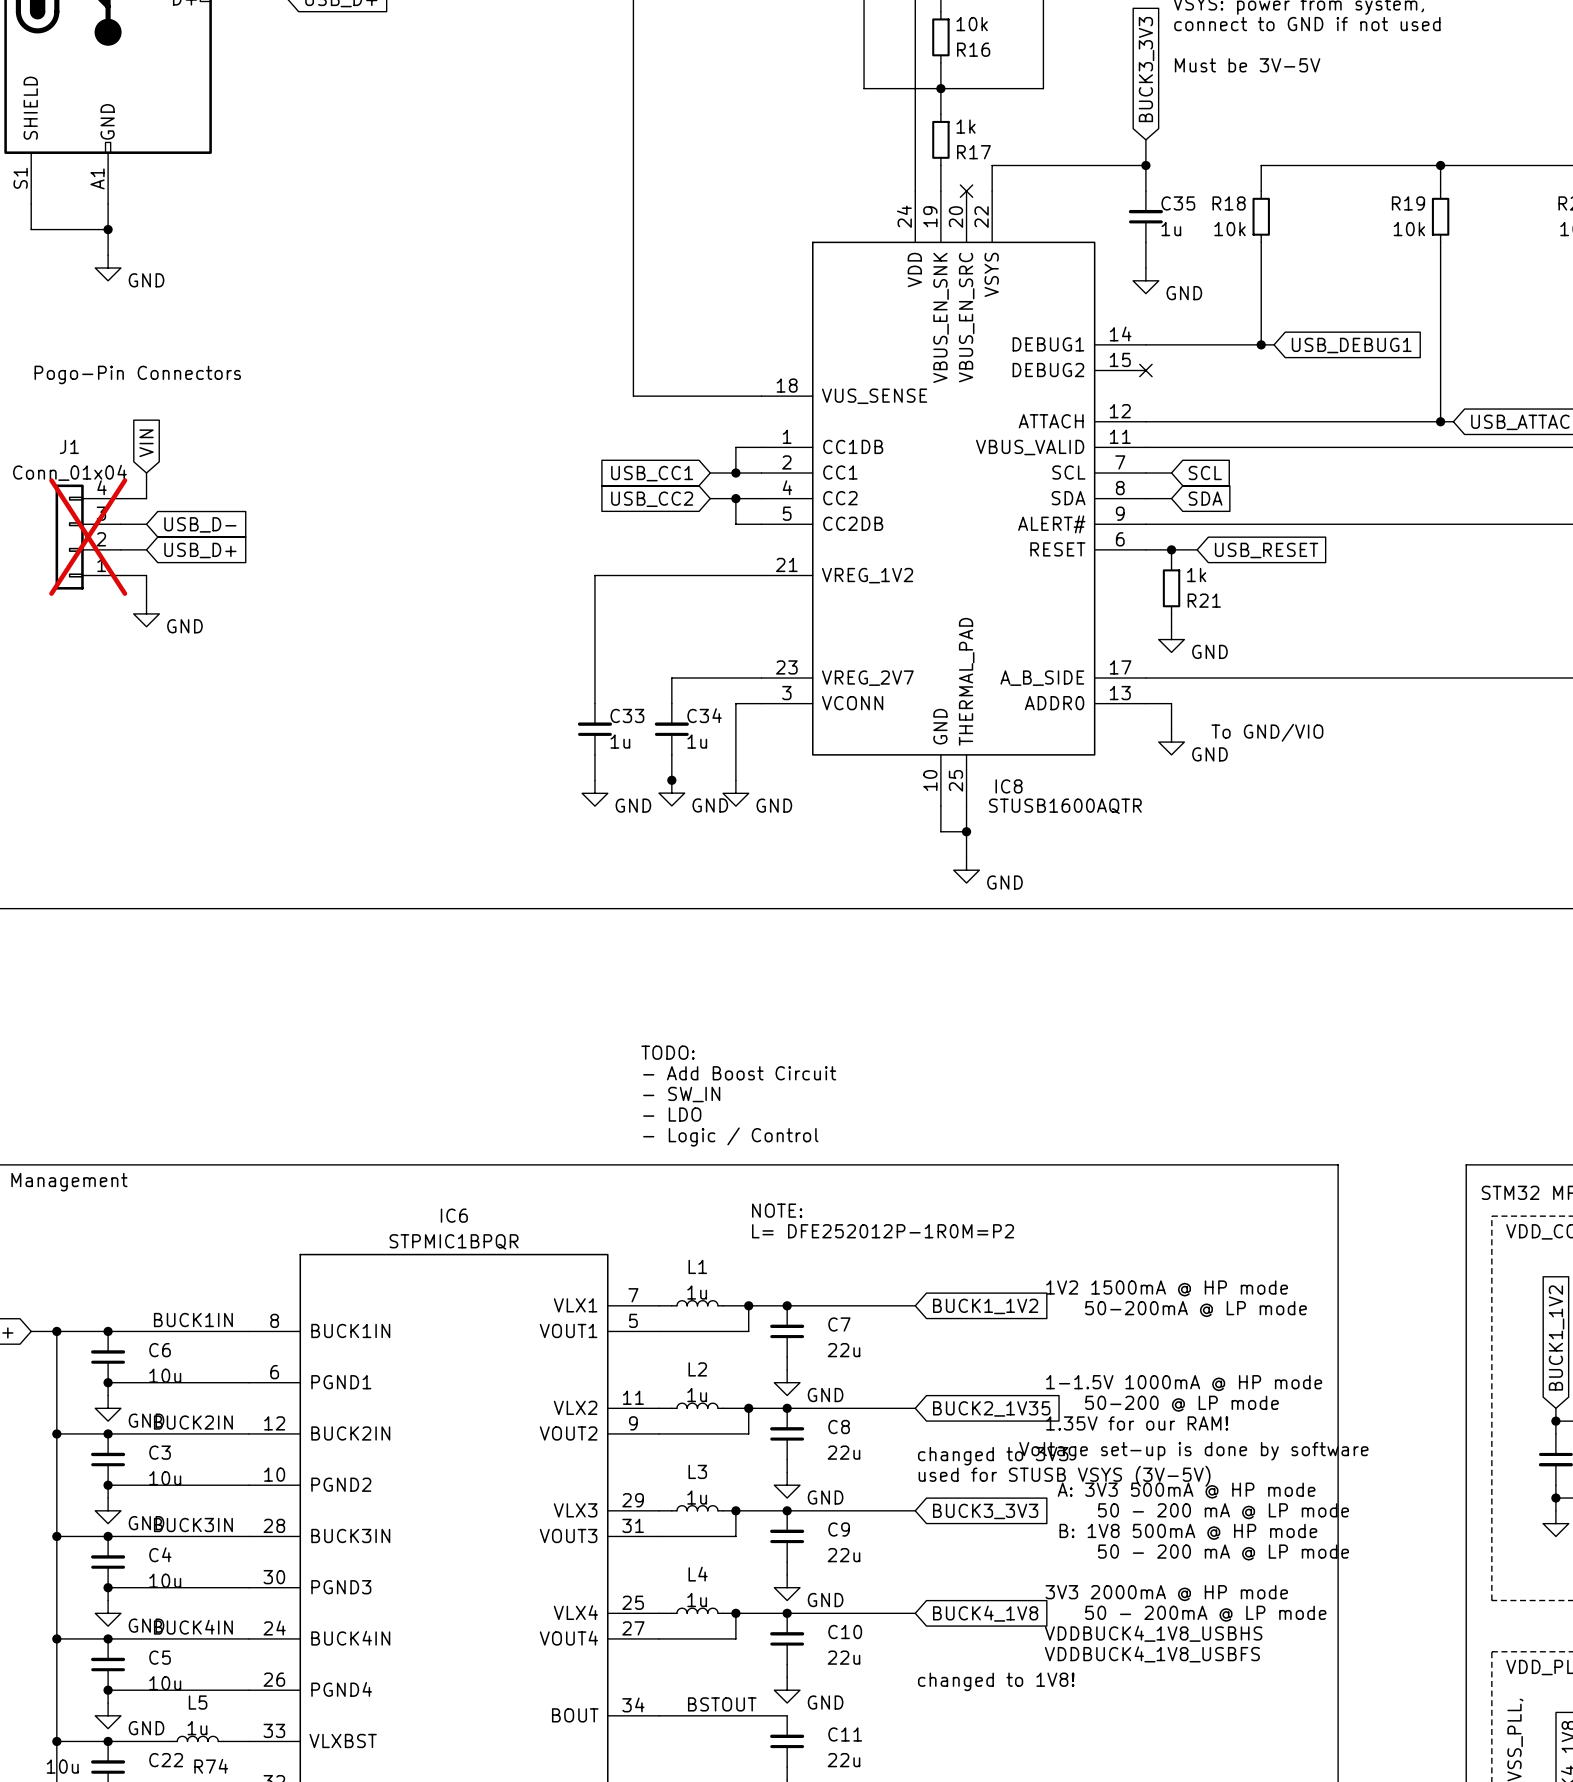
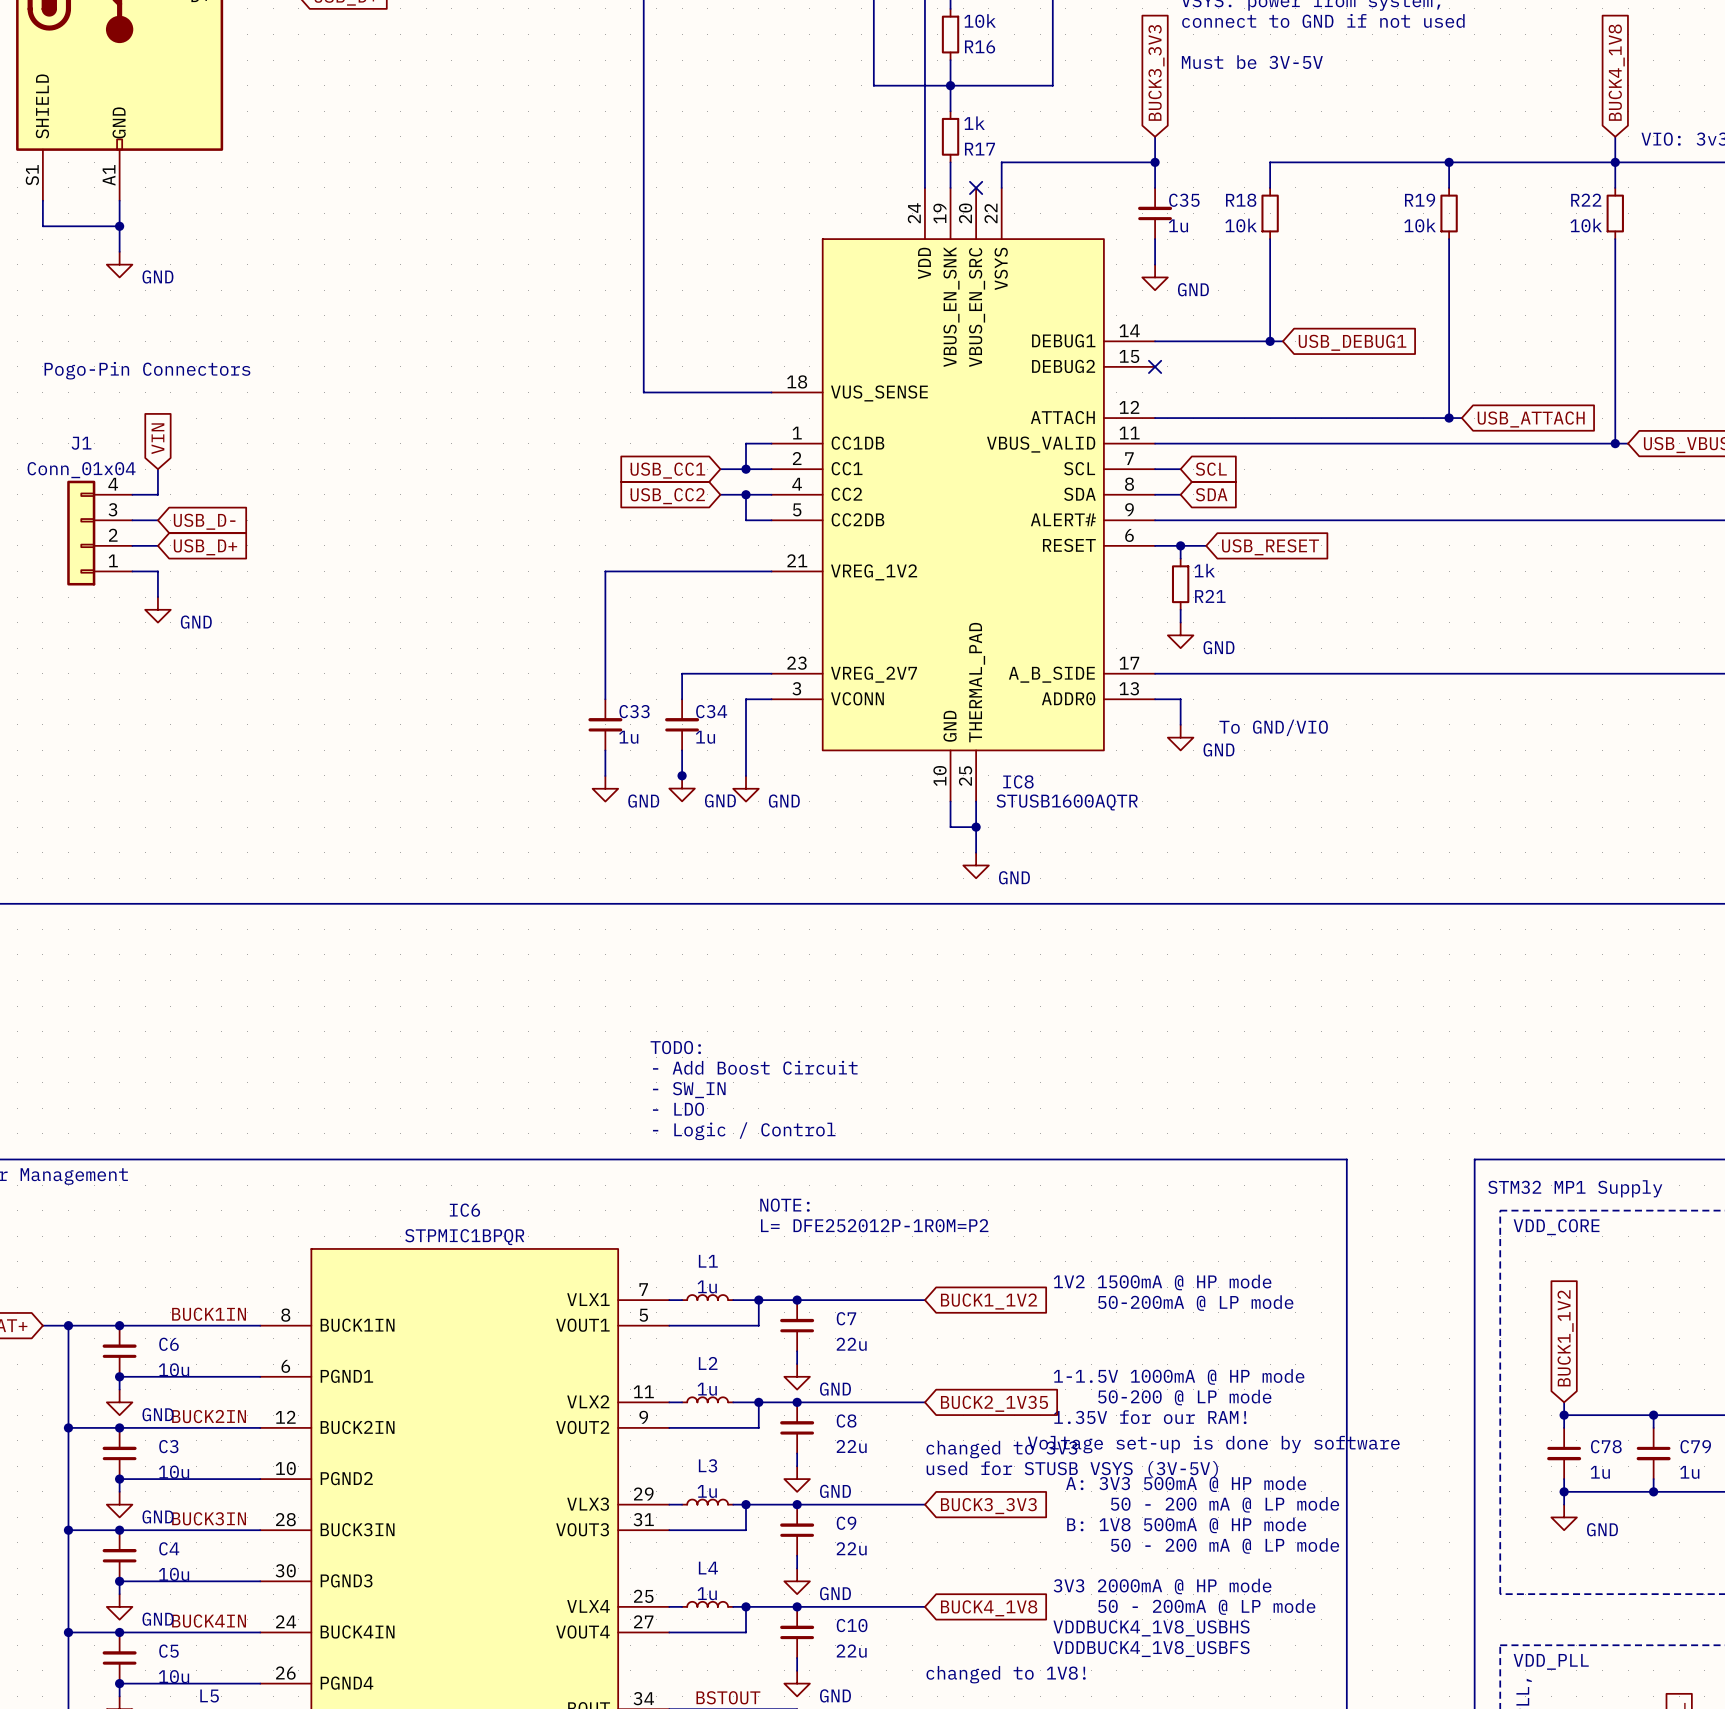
J1 do-not-place cross: (88, 537) -> none

